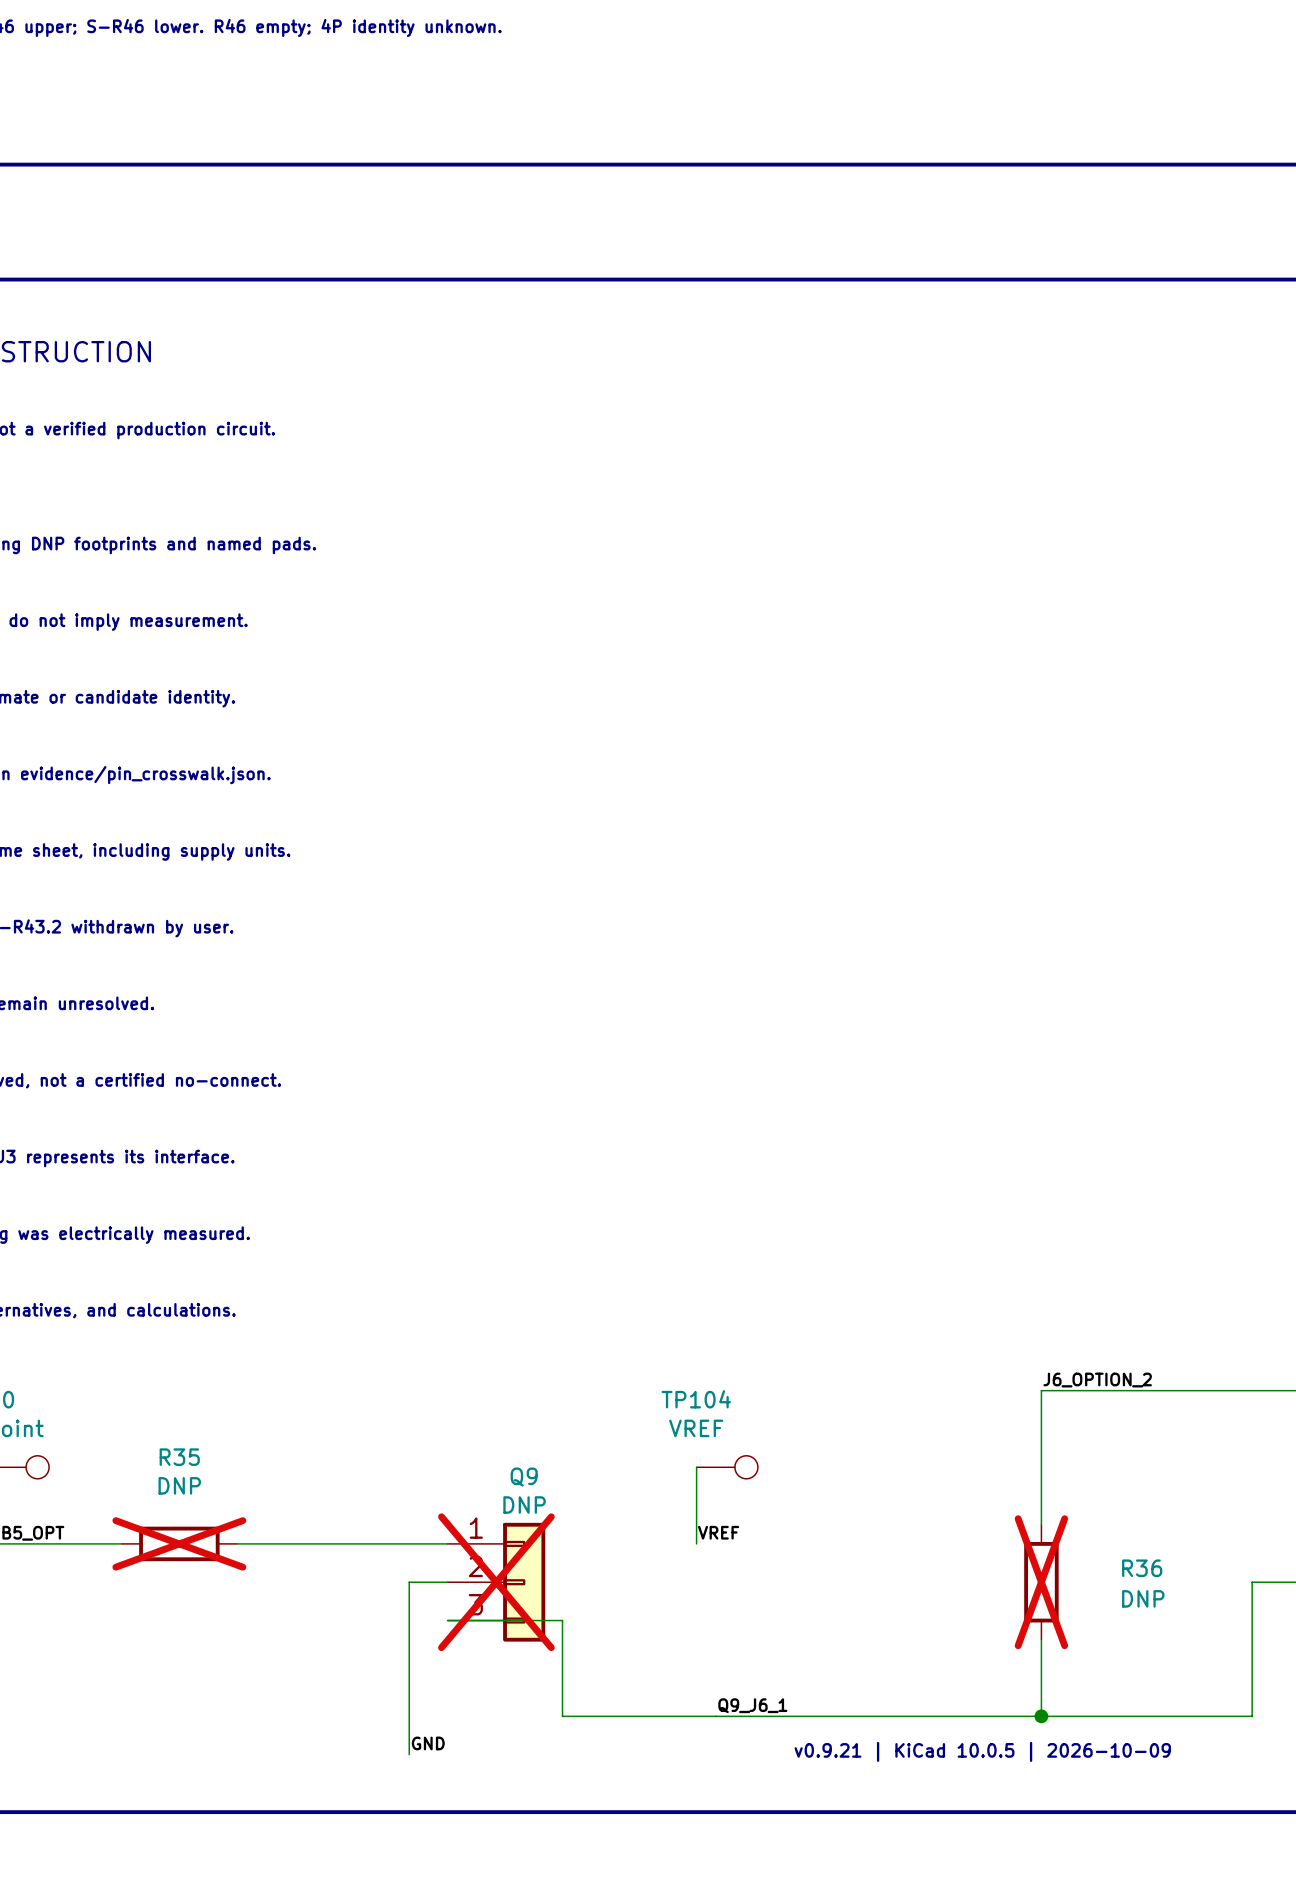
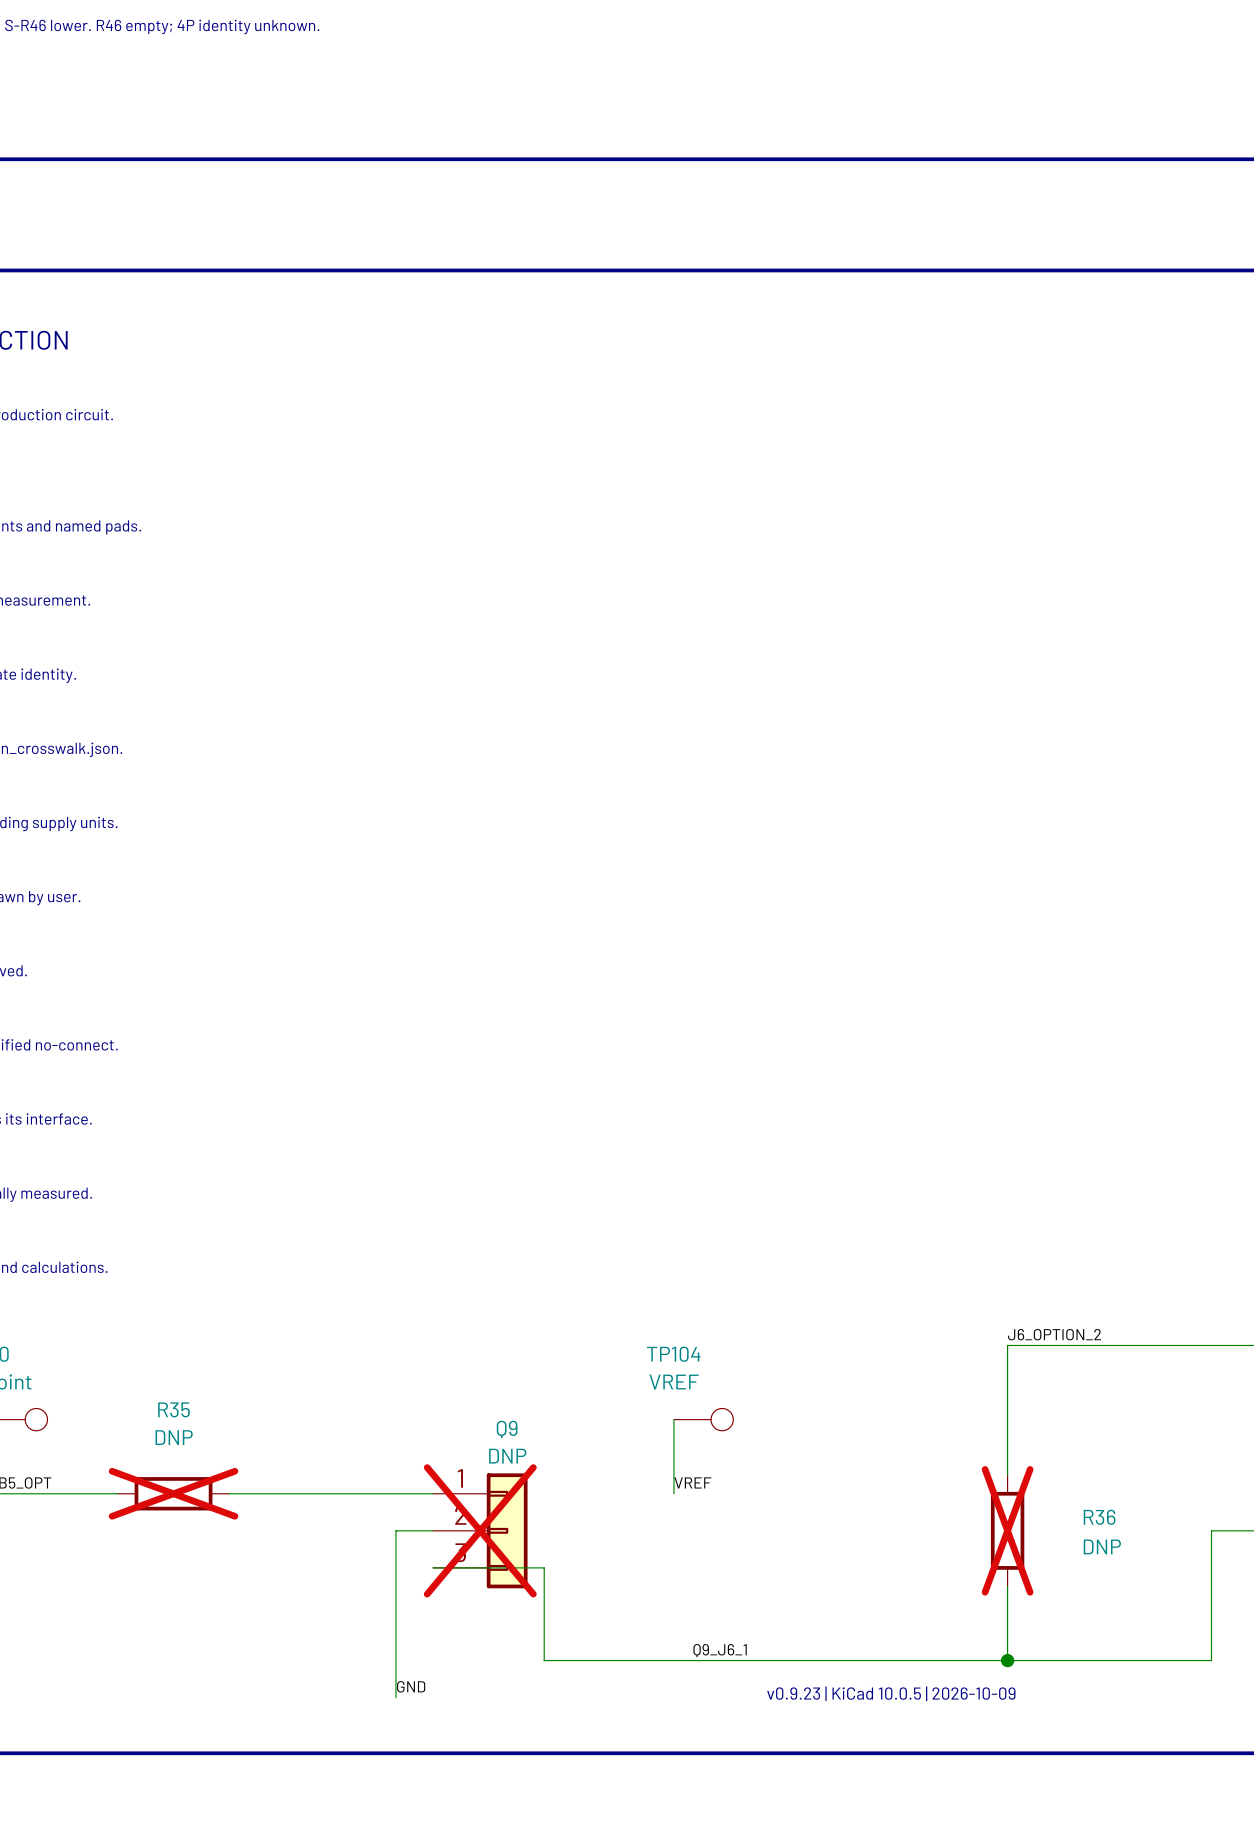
text: v0.9.21 | KiCad 10.0.5 | 2026-10-09 (982, 1751) -> v0.9.23 | KiCad 10.0.5 | 2026-10-09 (891, 1693)

